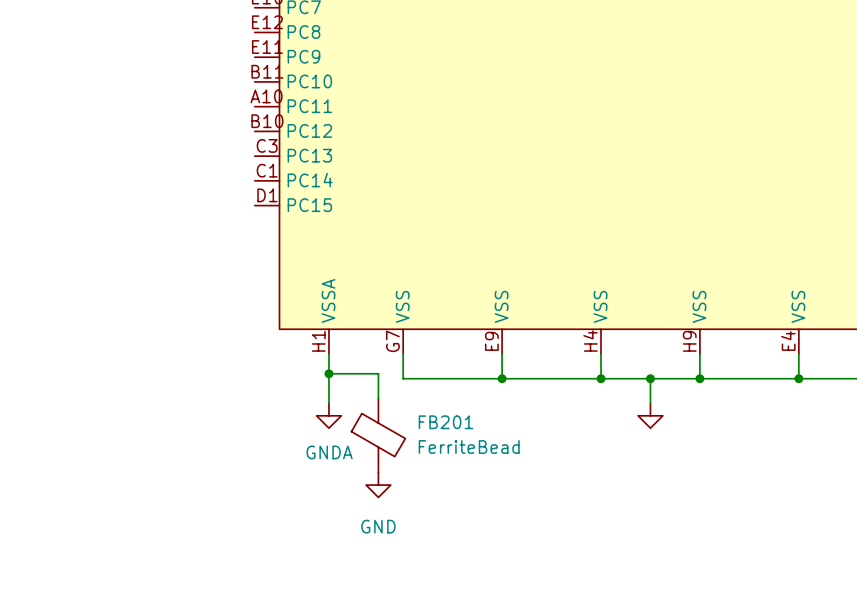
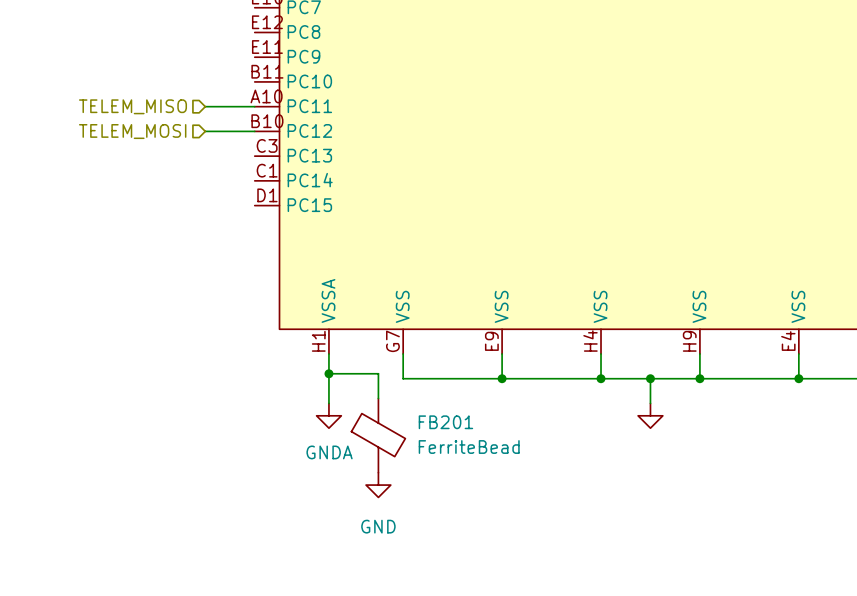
hierarchical label: none -> TELEM_MISO (132, 106)
wire: none -> (205, 106) (254, 106)
hierarchical label: none -> TELEM_MOSI (132, 131)
wire: none -> (205, 131) (254, 131)

